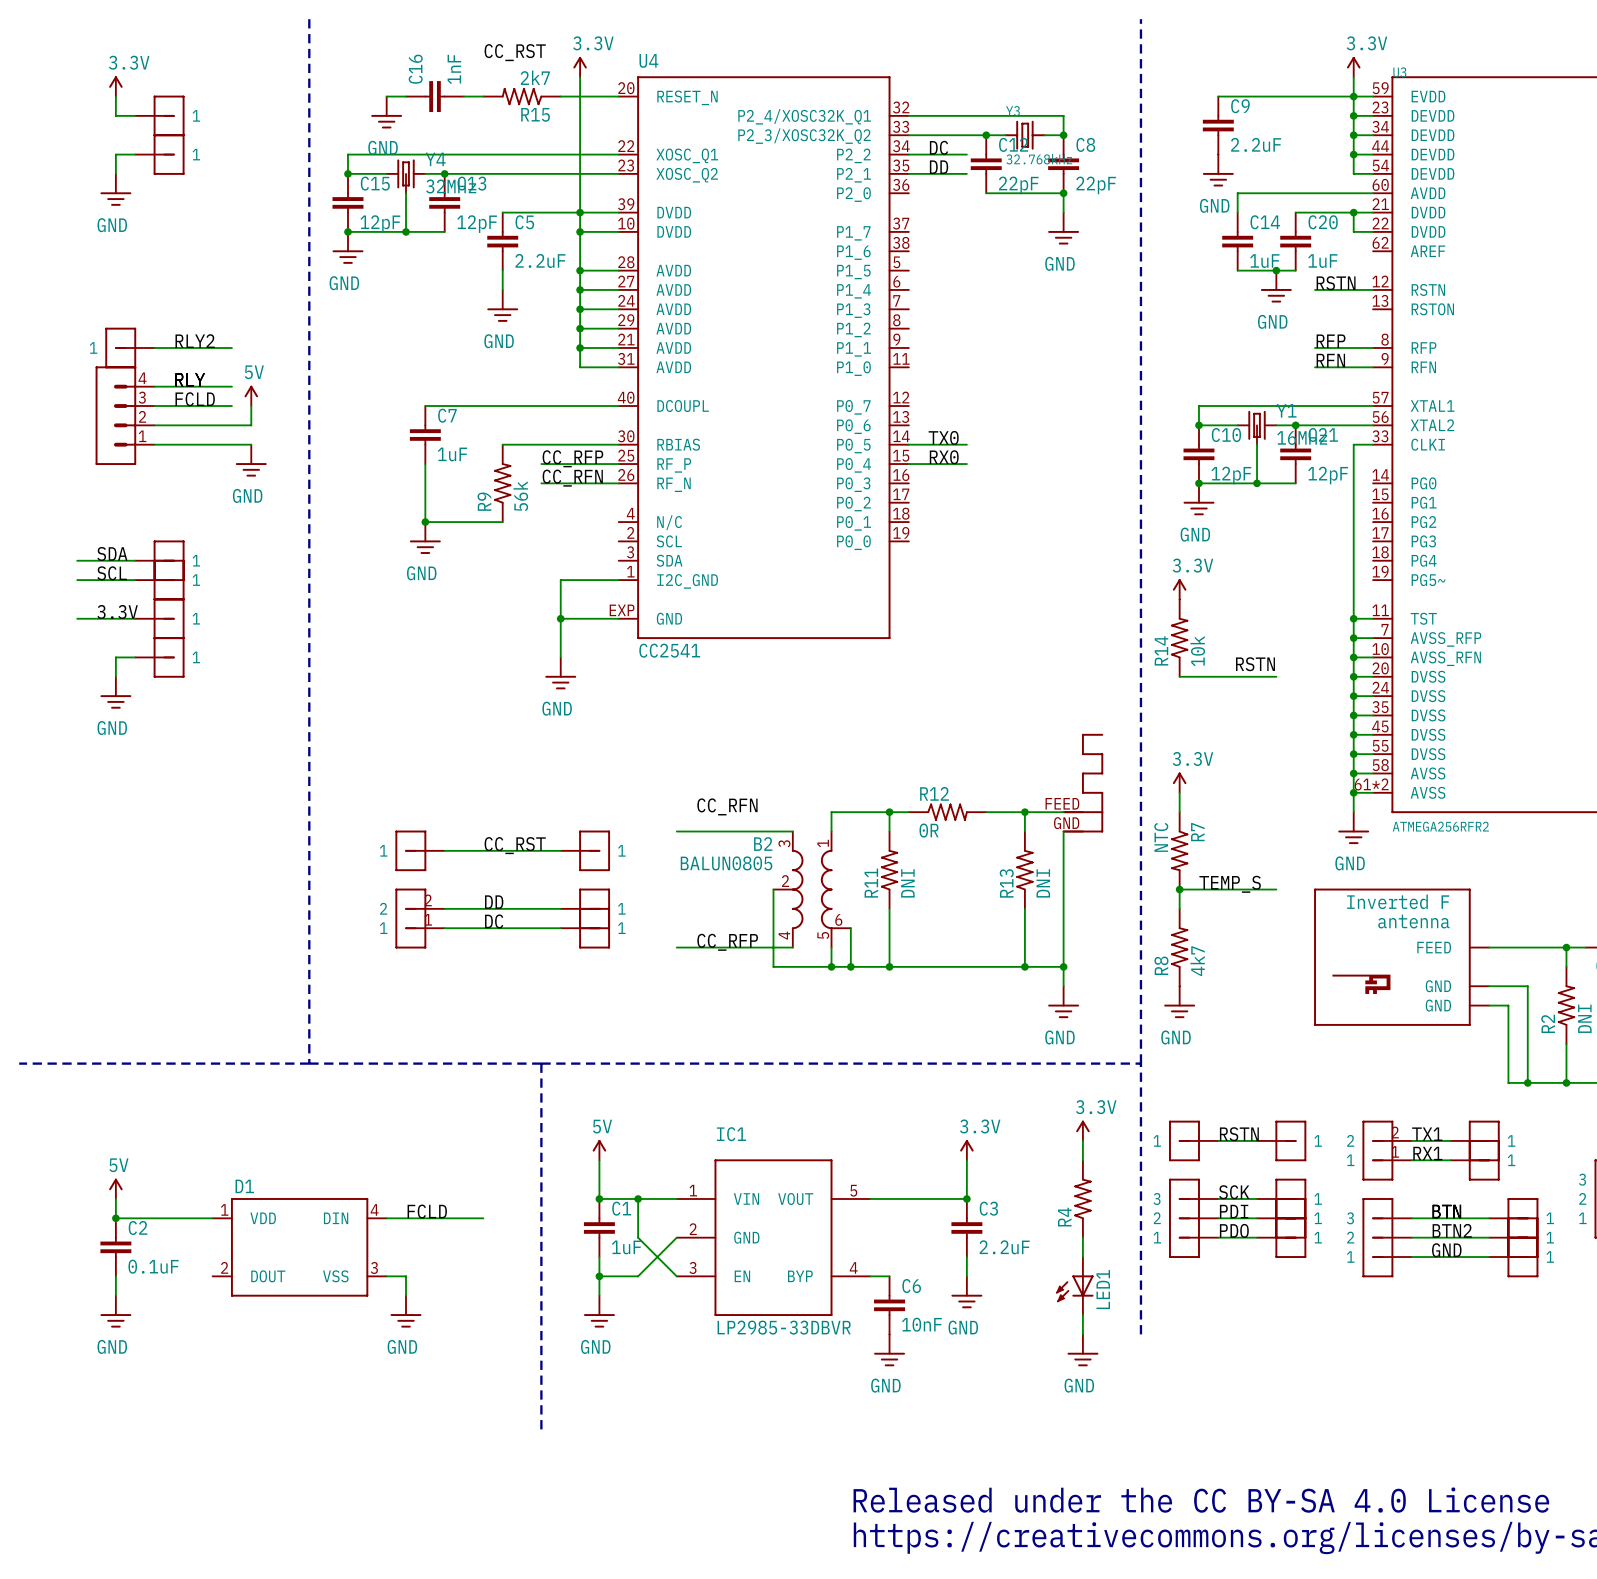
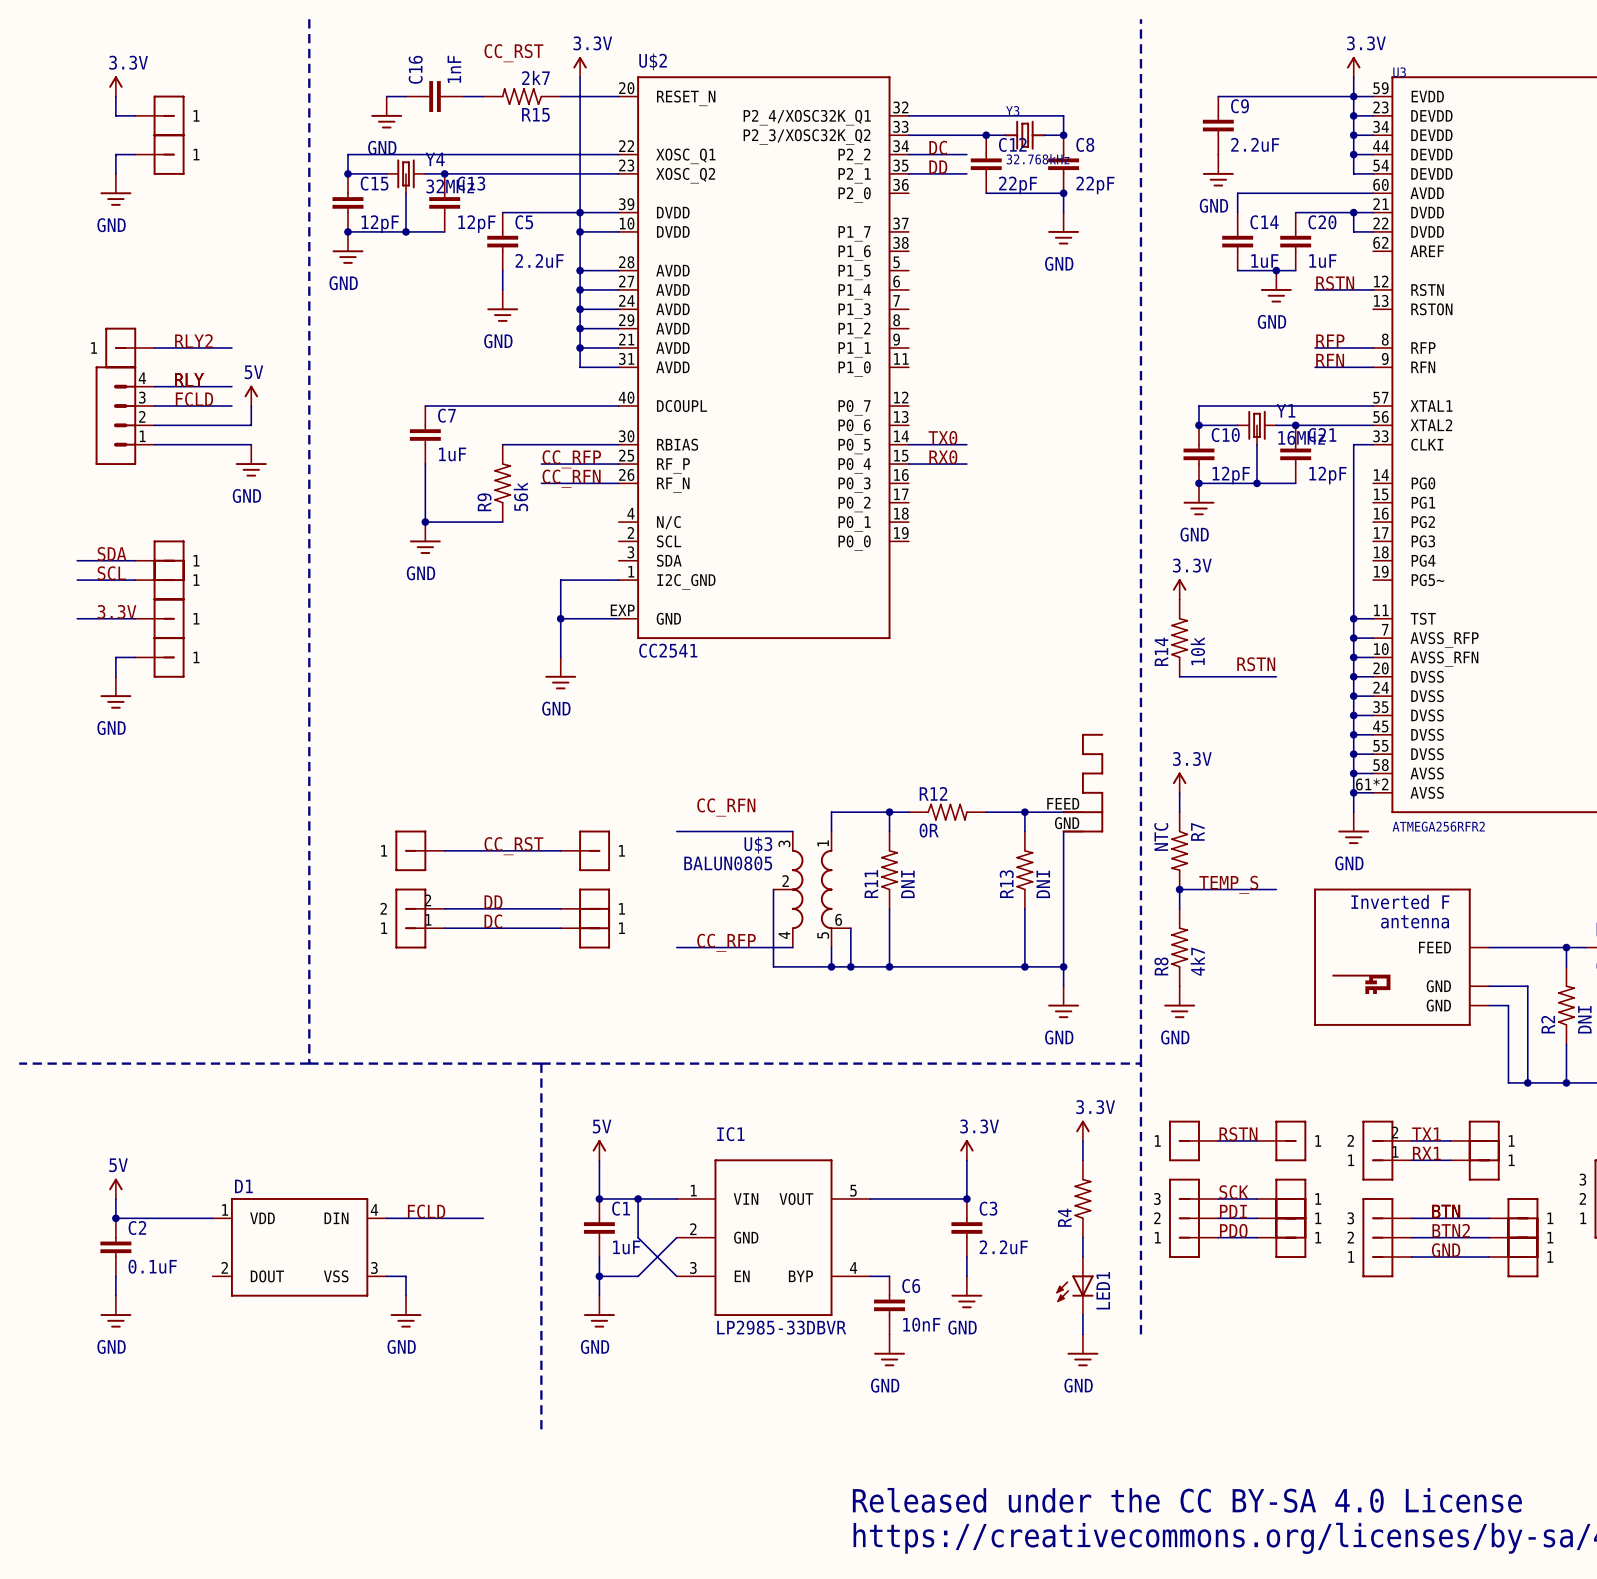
U4 name: U4 (648, 60) -> U$2 (653, 61)
B2 name: B2 (763, 843) -> U$3 (758, 845)

